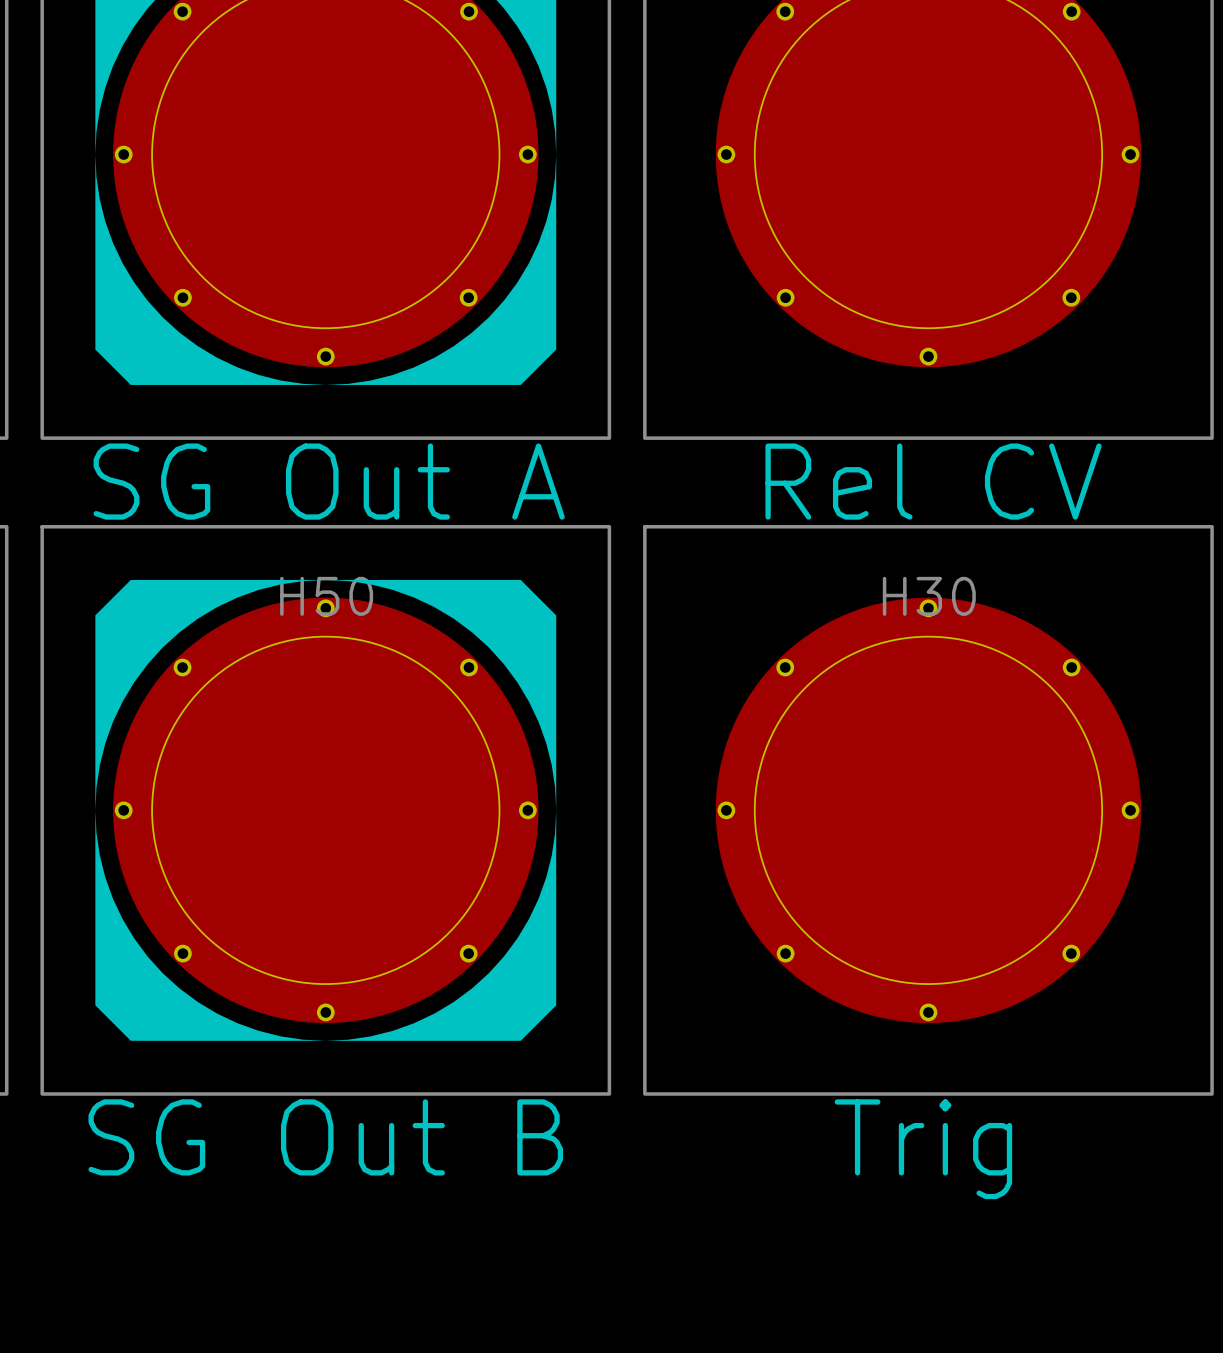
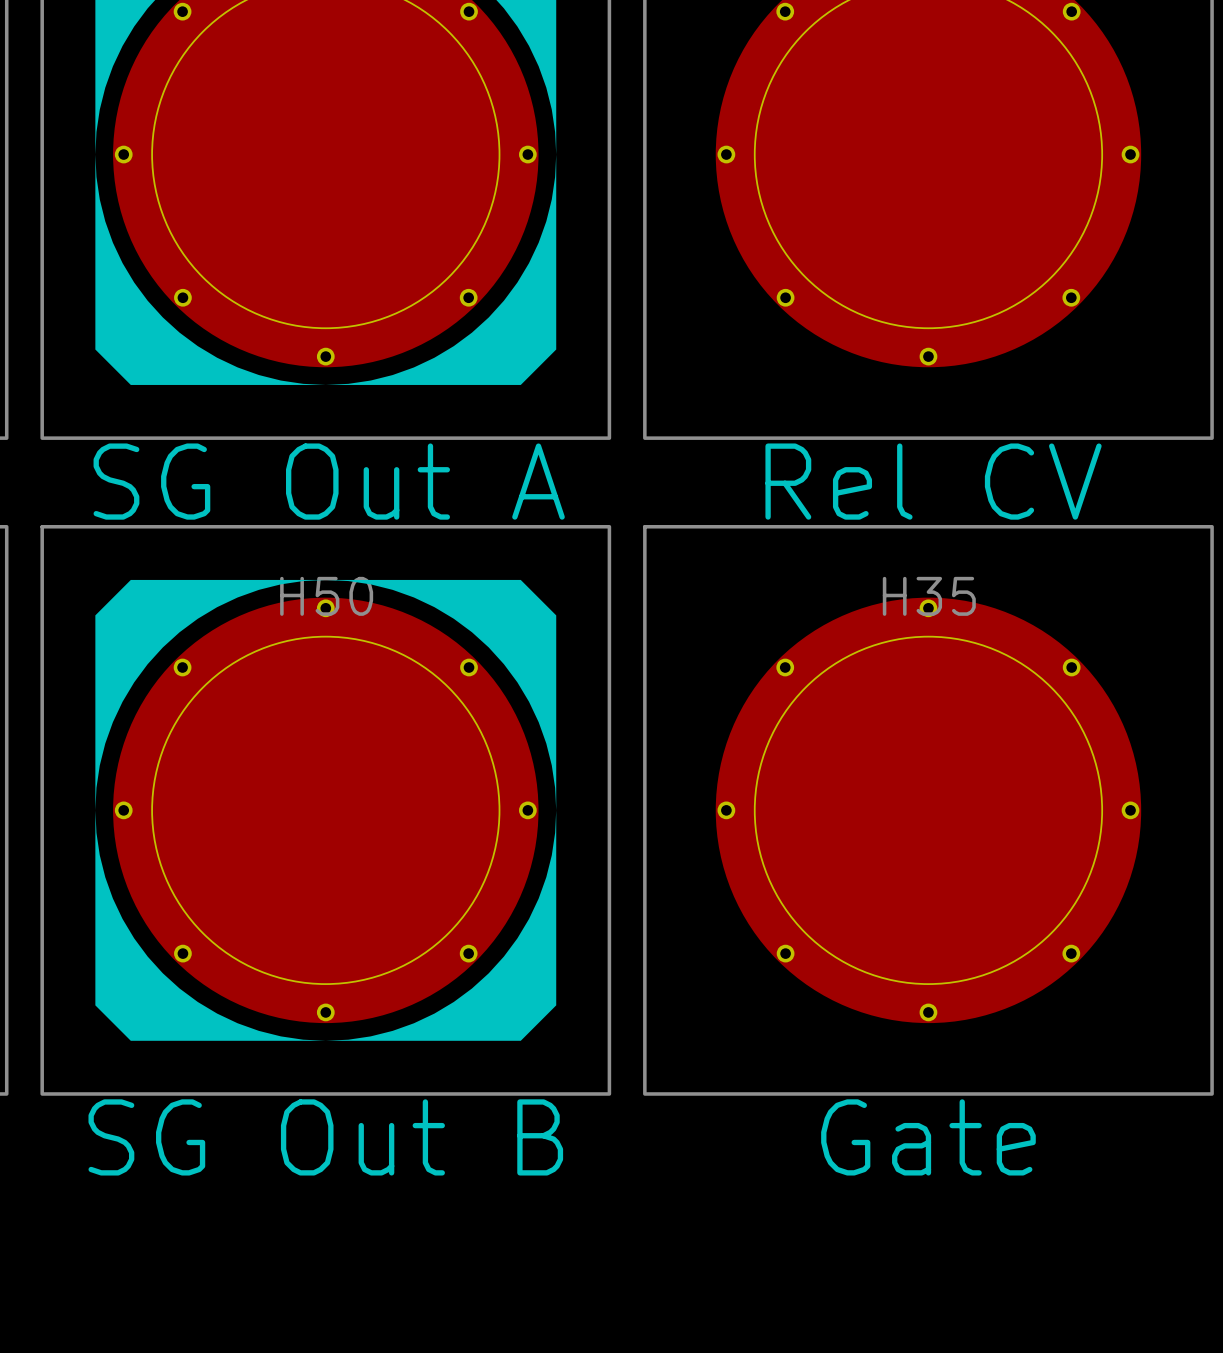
H30 name: H30 (929, 596) -> H35 (929, 596)
H30 value: Trig (923, 1149) -> Gate (928, 1137)

